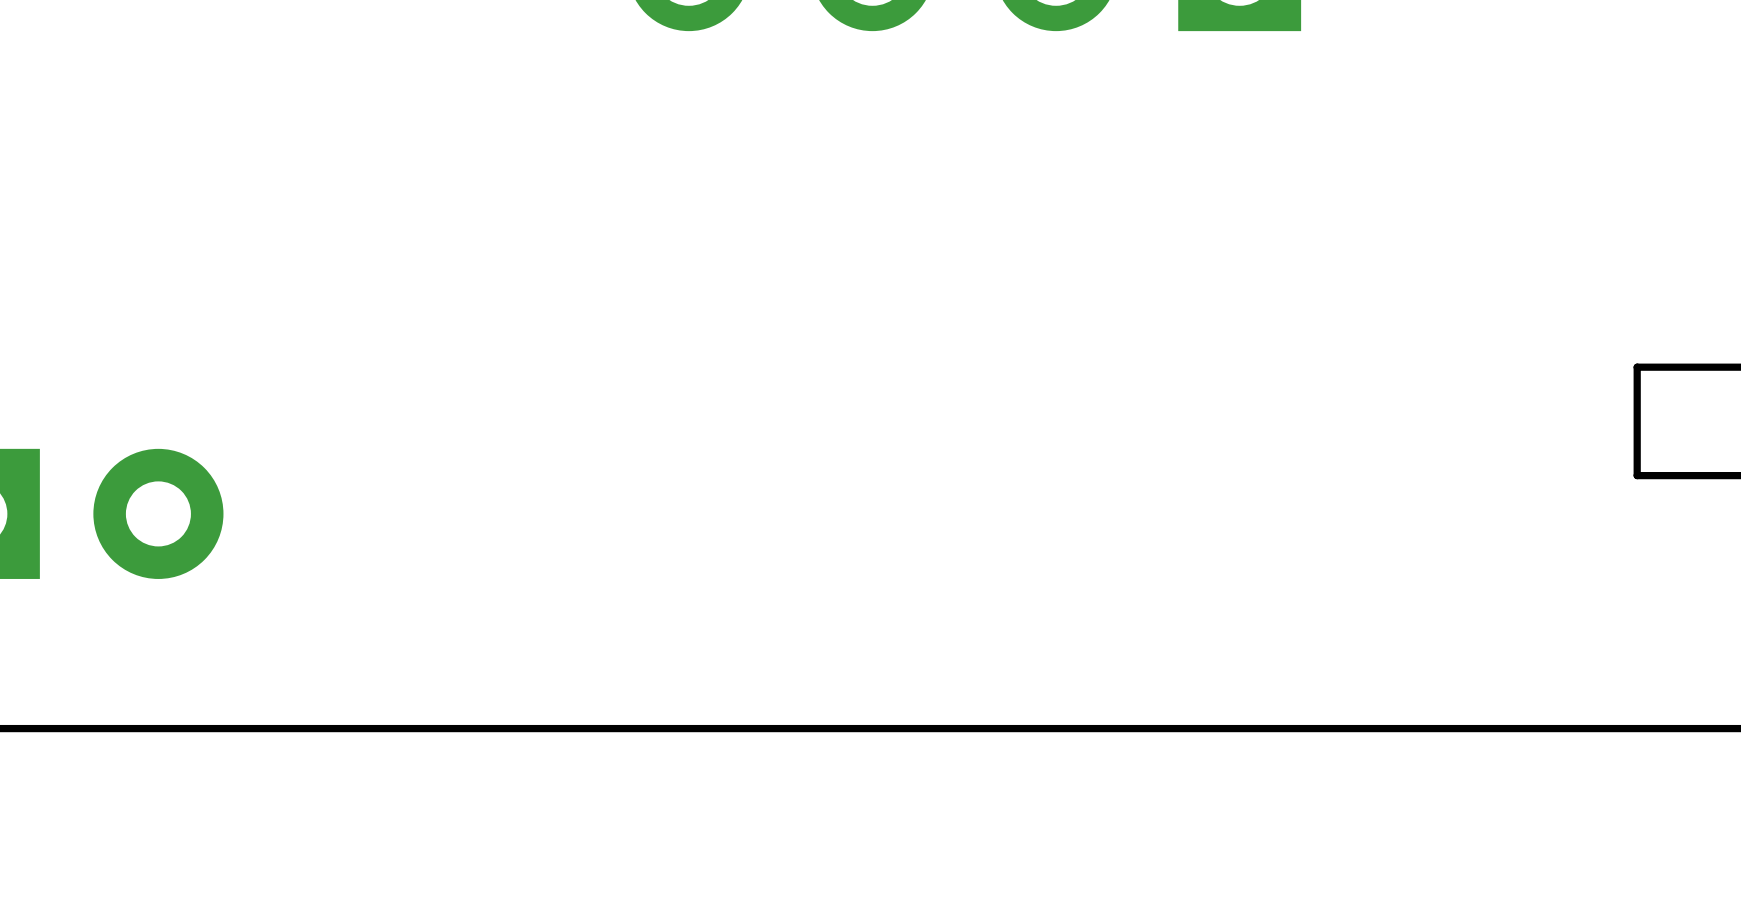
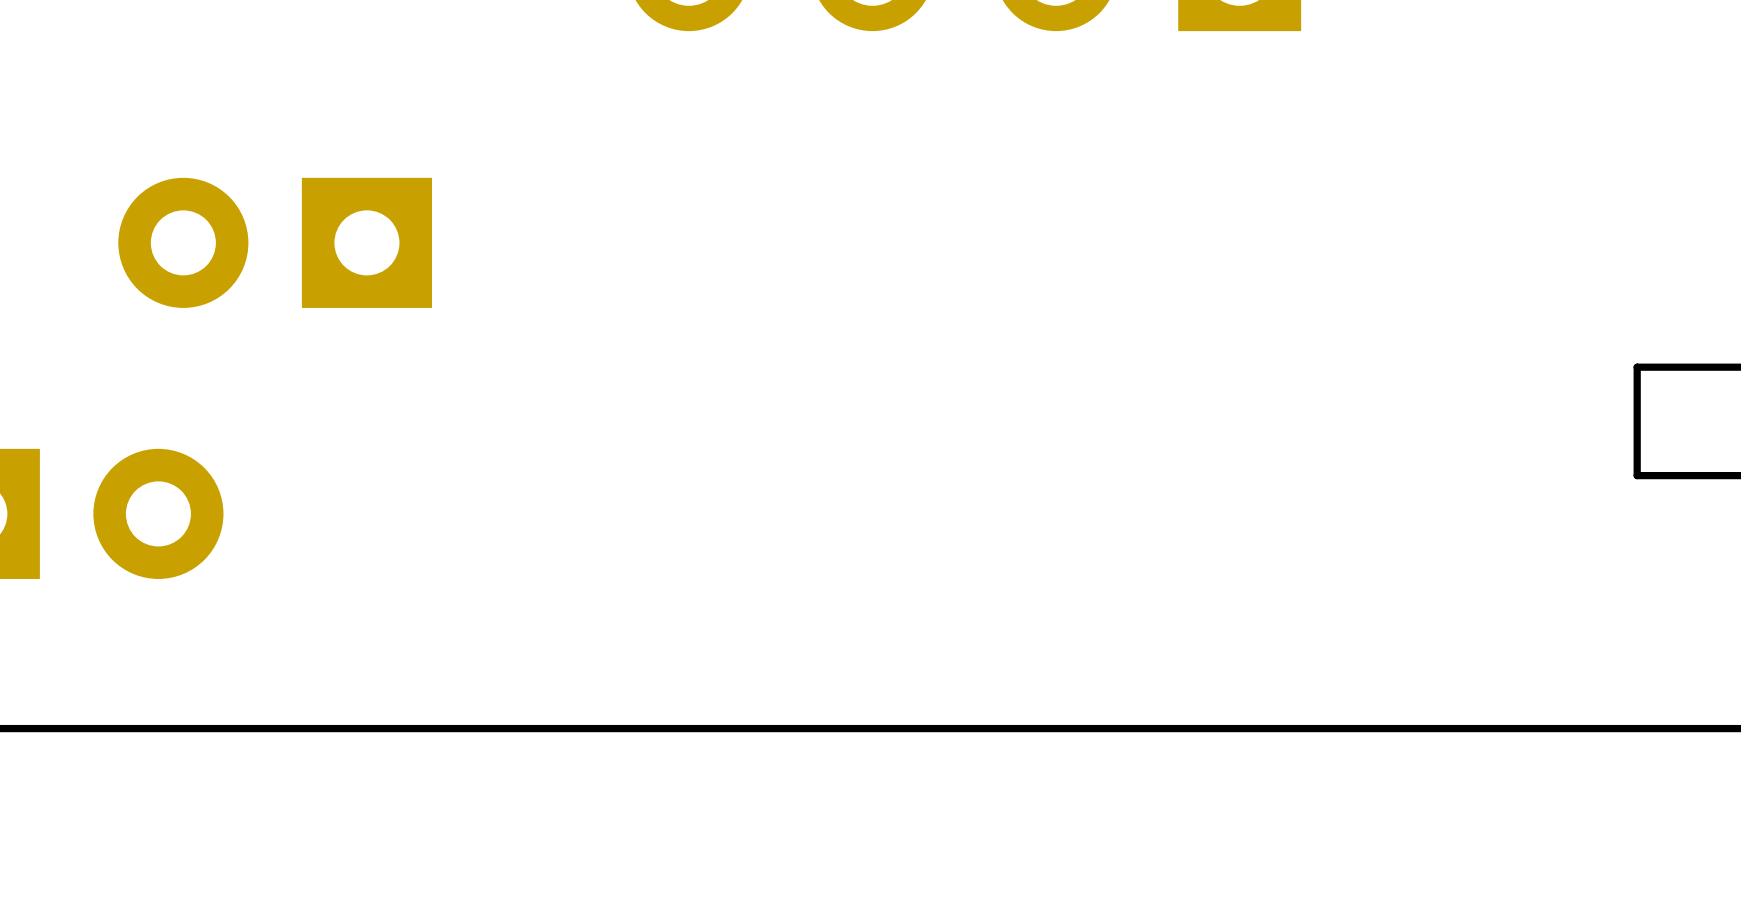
part: none -> (275, 242)

